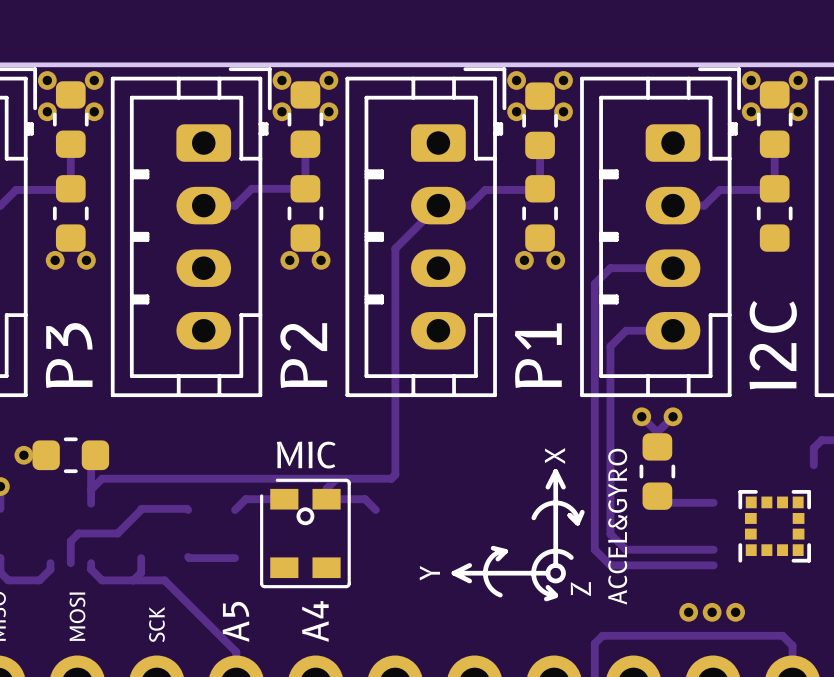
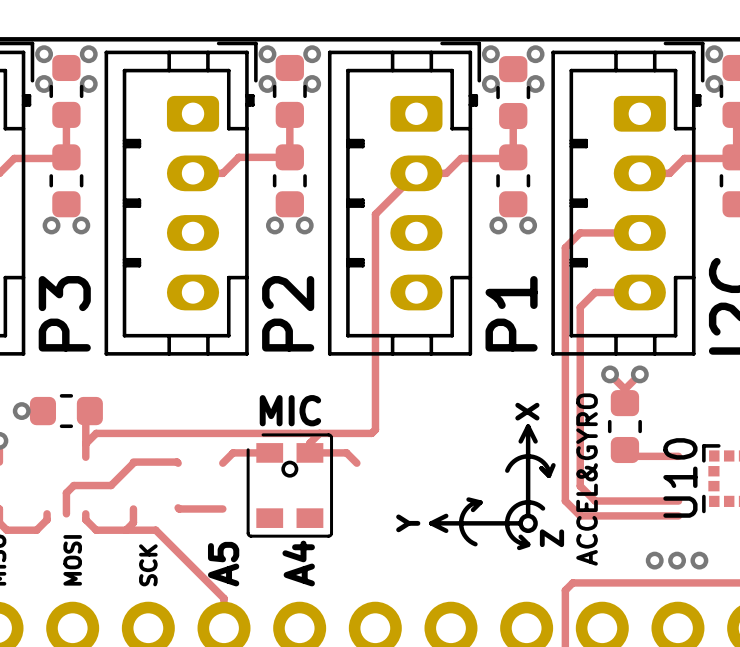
U10 name: none -> U10 (680, 477)

